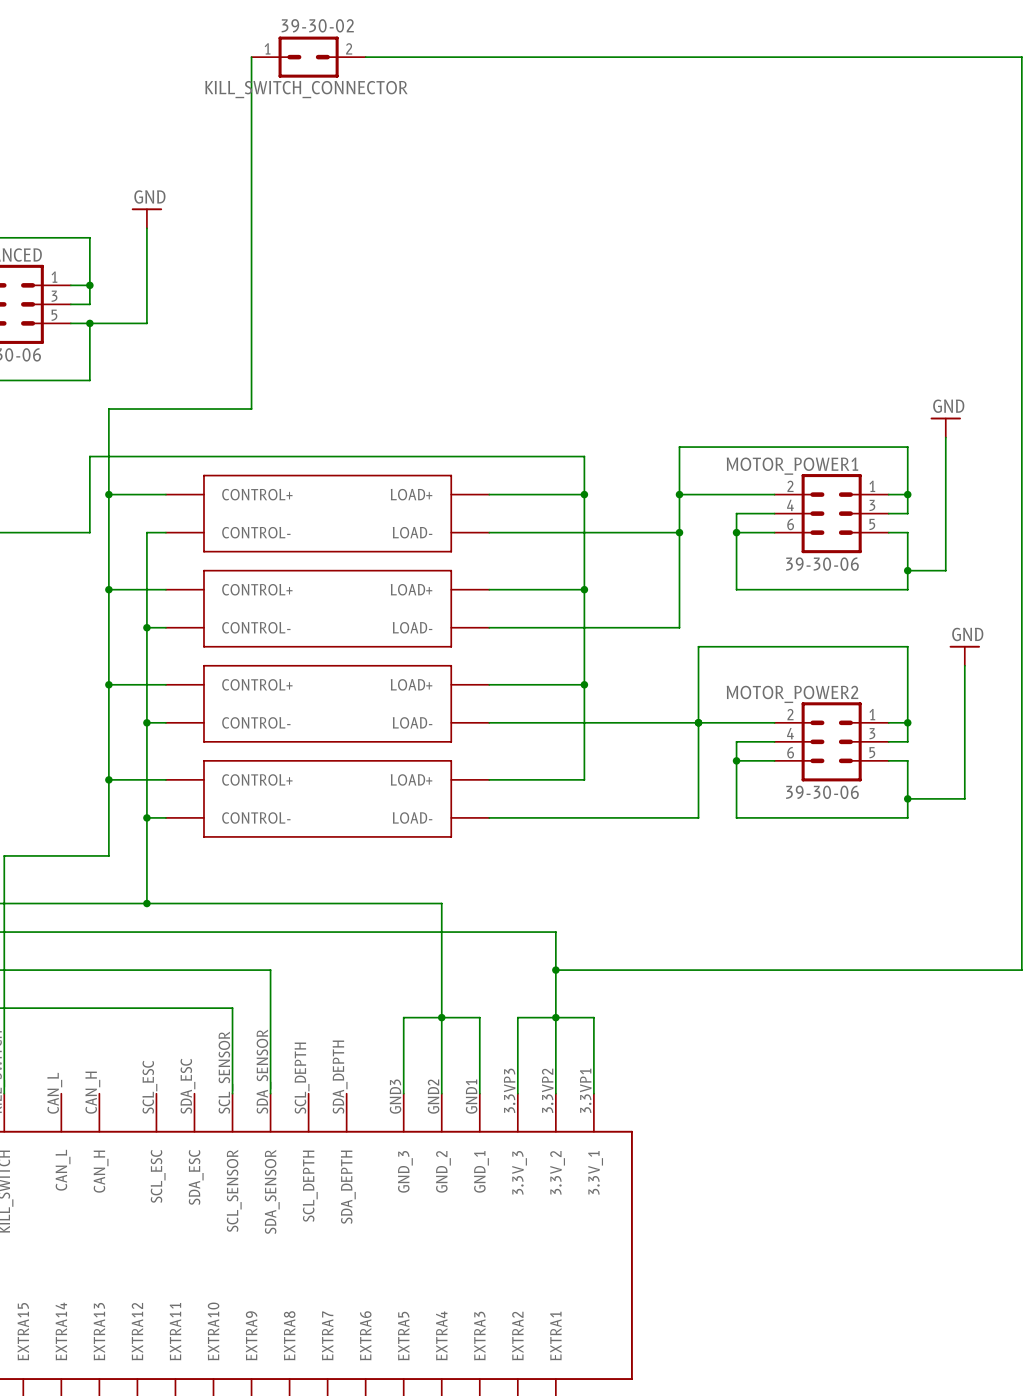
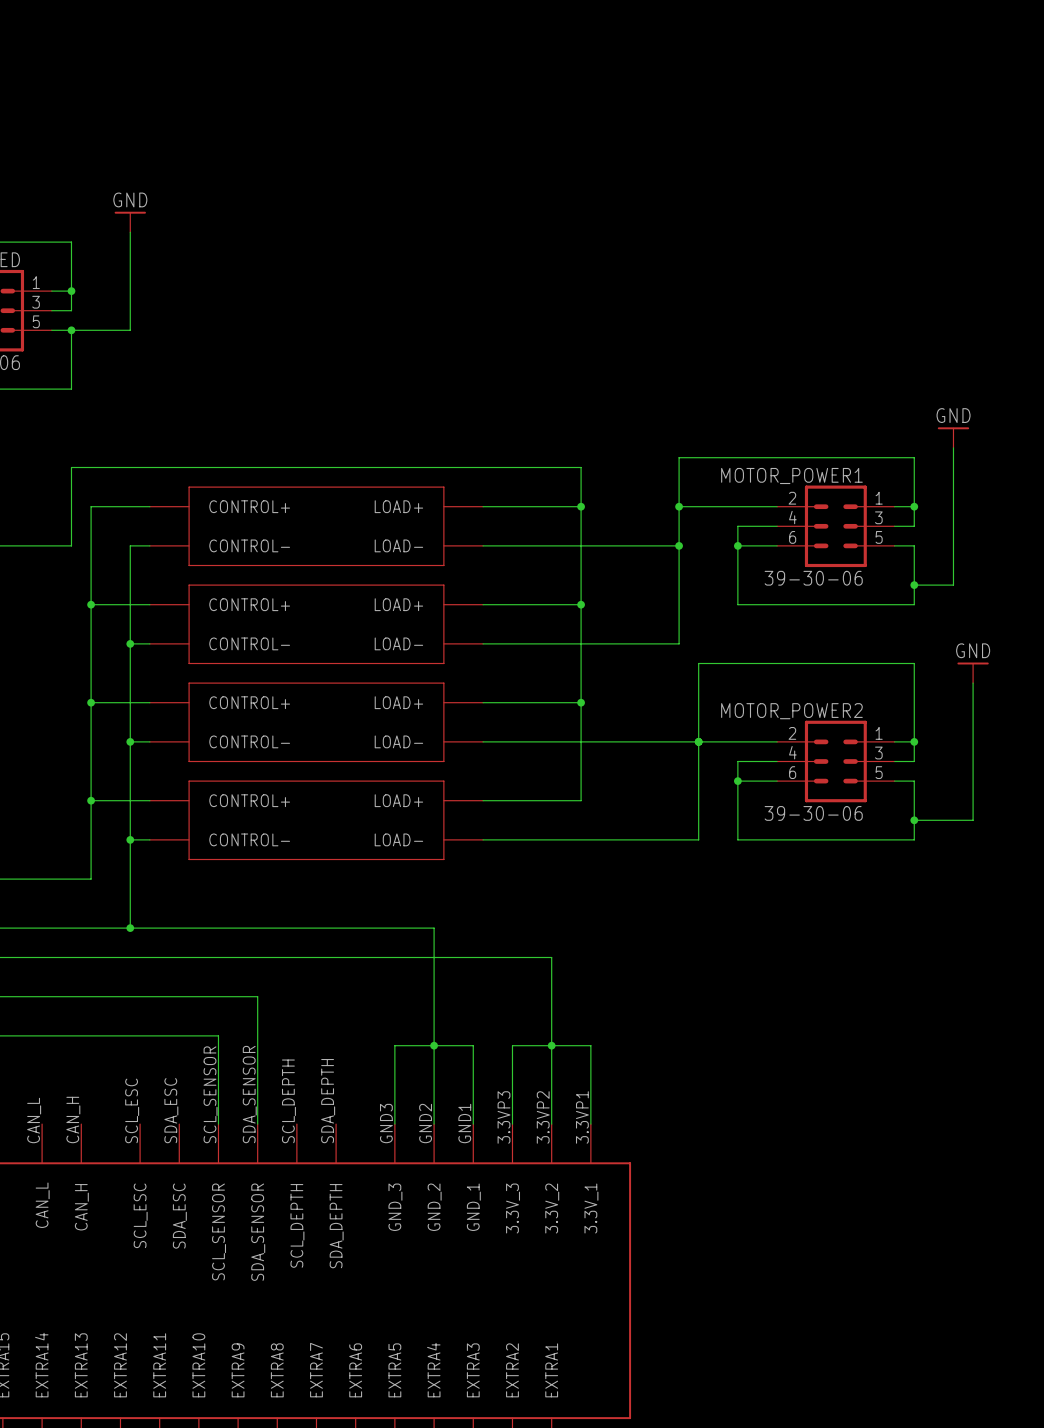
wire: (251, 57) (251, 408) (108, 408) (108, 494) -> none
KILL_SWITCH_CONNECTOR: 39-30-02 (308, 57) -> none
wire: (365, 57) (1021, 57) (1021, 970) (555, 970) -> none
junction: (108, 494) -> none
junction: (555, 970) -> none

